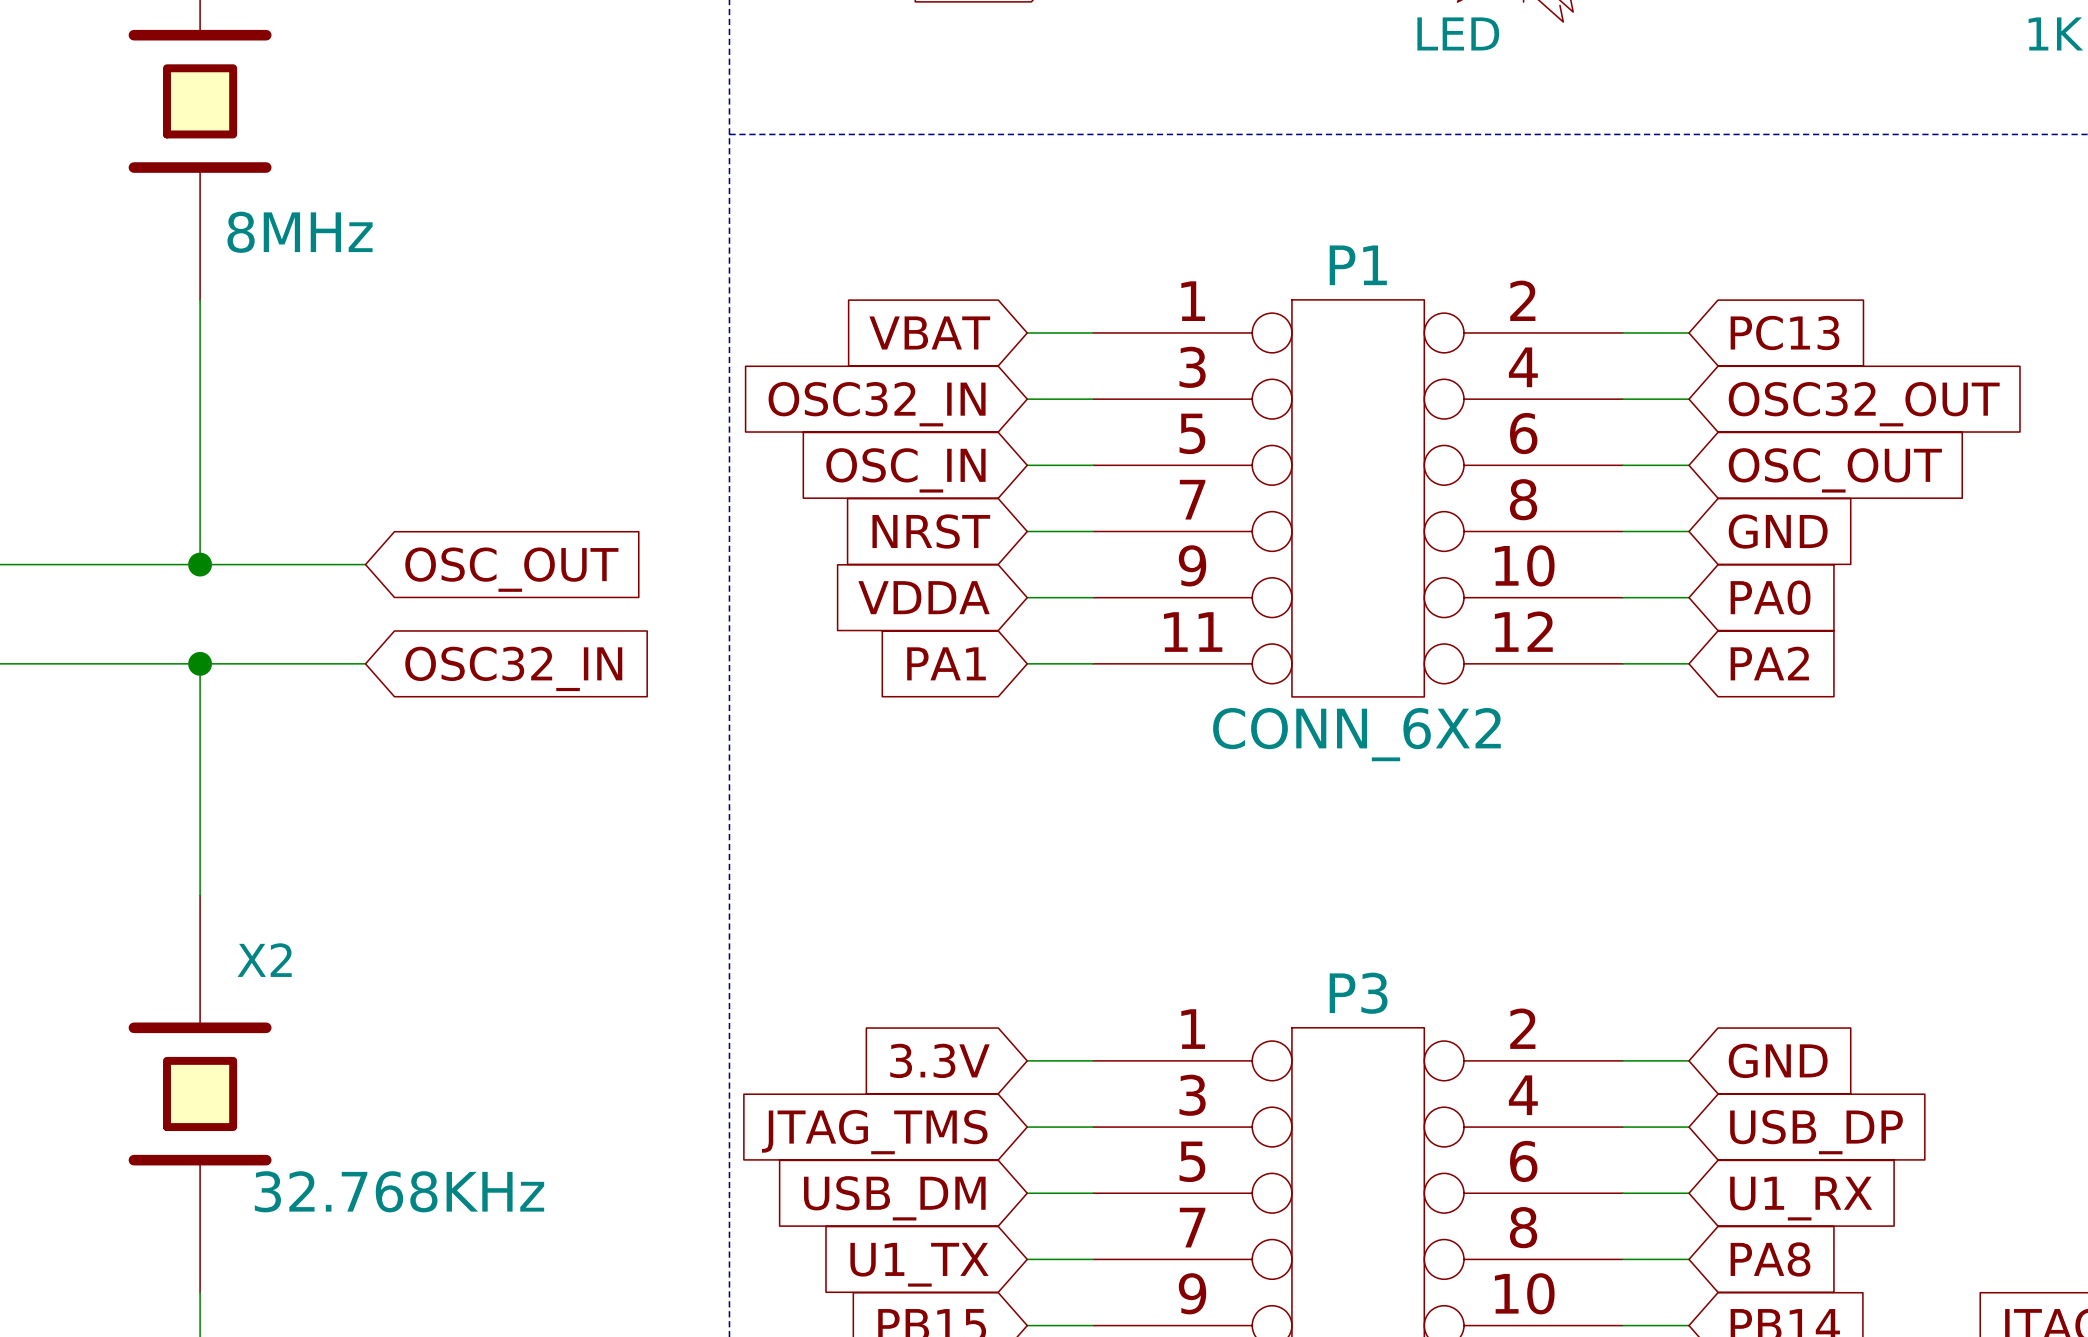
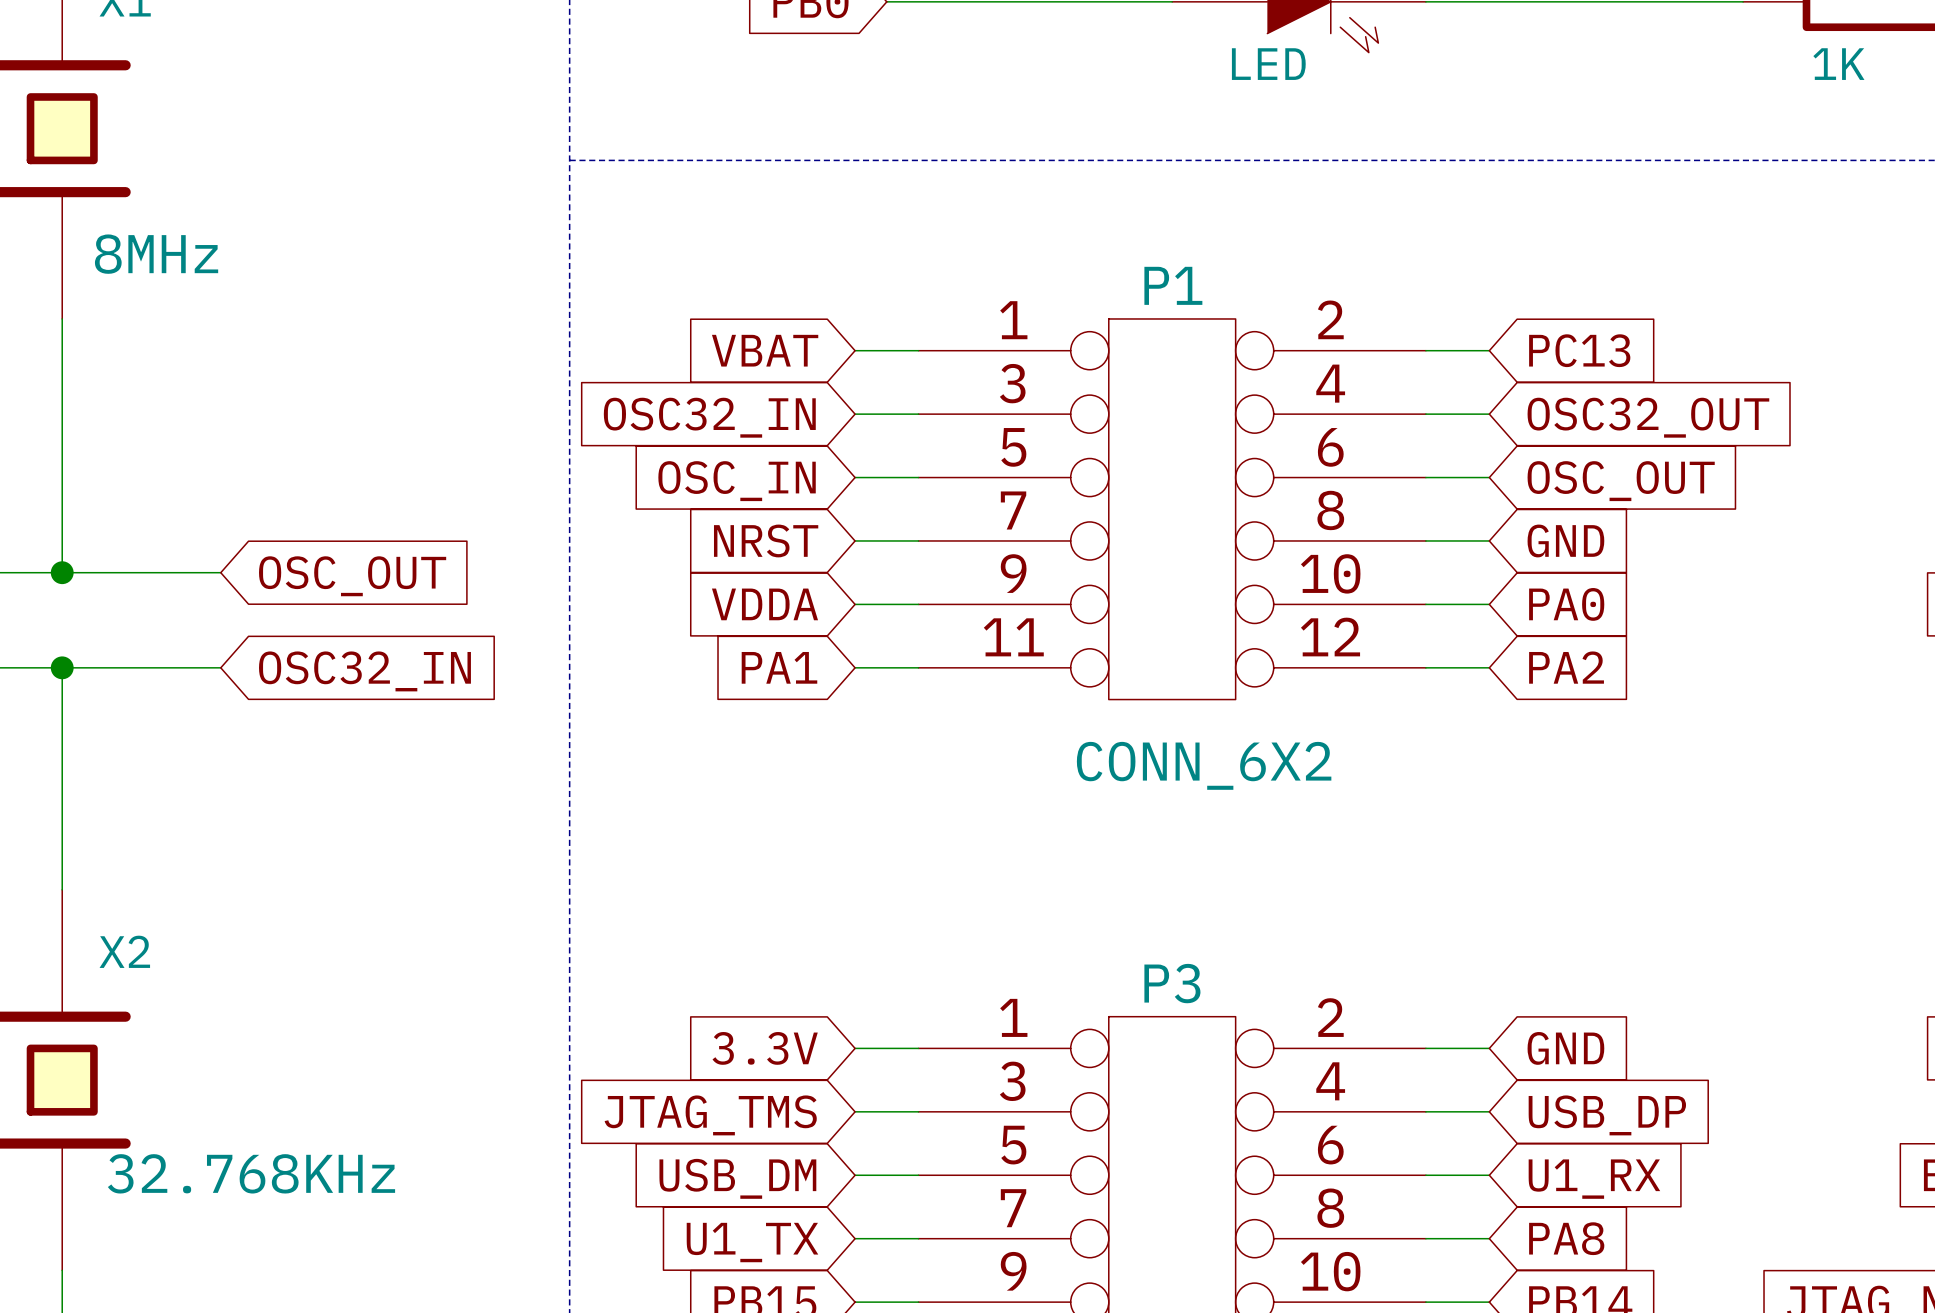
P1 value position: CONN_6X2 (1356, 734) -> CONN_6X2 (1204, 765)

